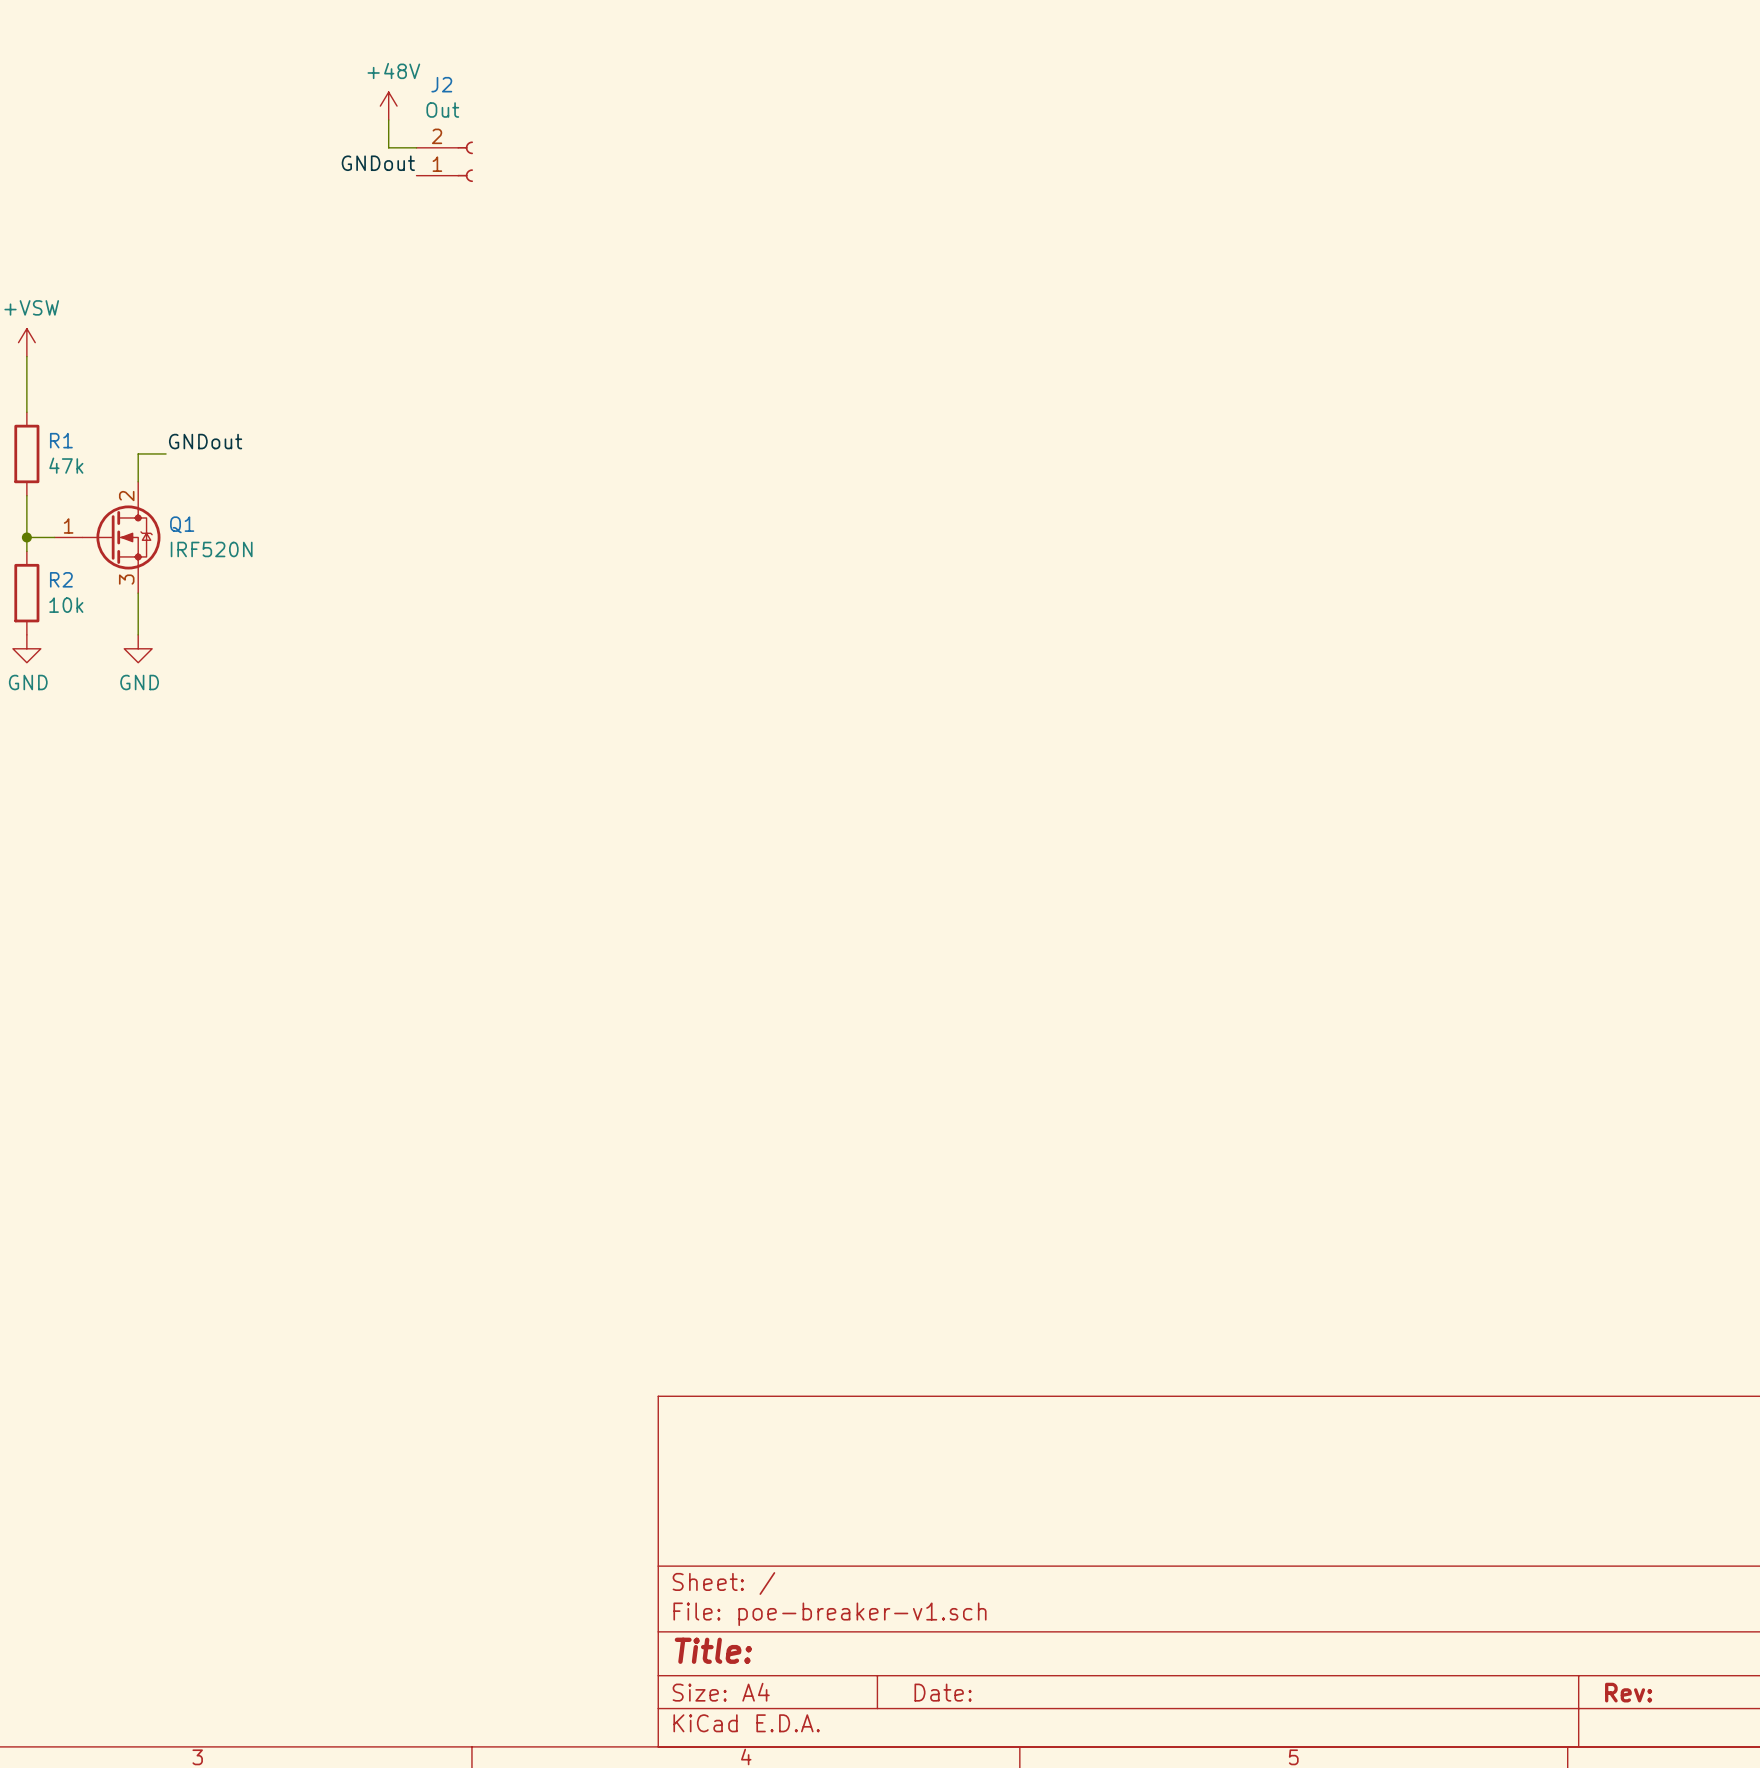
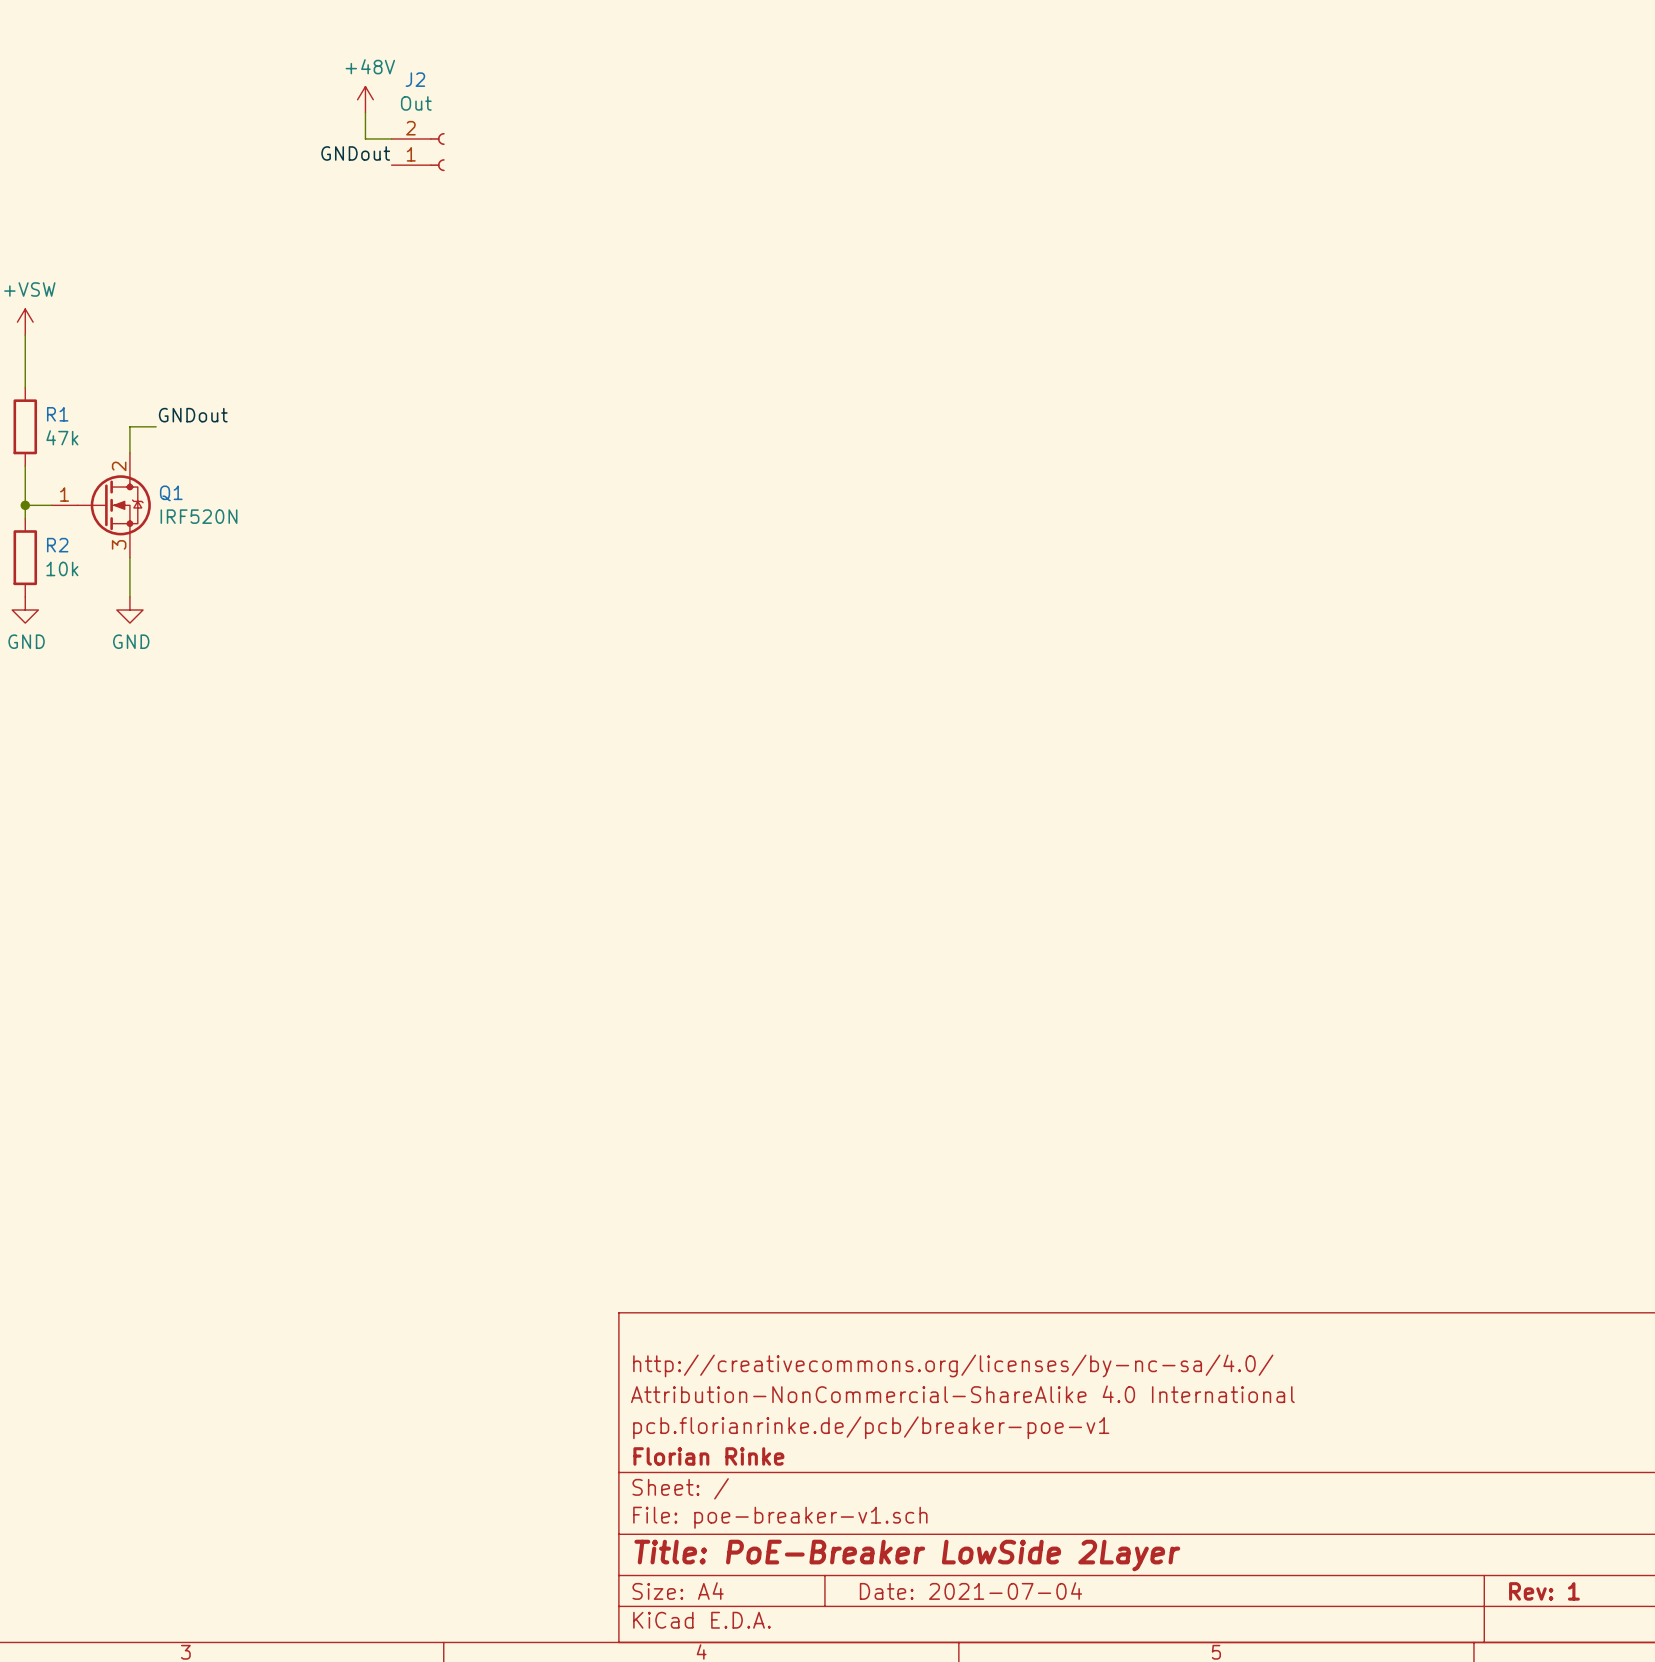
title block: none -> http://creativecommons.org/licenses/by-nc-sa/4.0/ (953, 1365)
title block: none -> Attribution-NonCommercial-ShareAlike 4.0 International (962, 1394)
title block: none -> pcb.florianrinke.de/pcb/breaker-poe-v1 (871, 1427)
title block: none -> Florian Rinke (708, 1456)
title block: Title: (713, 1650) -> Title: PoE-Breaker LowSide 2Layer (907, 1555)
title block: Date: (943, 1692) -> Date: 2021-07-04 (970, 1591)
title block: Rev: (1628, 1692) -> Rev: 1 (1544, 1591)

